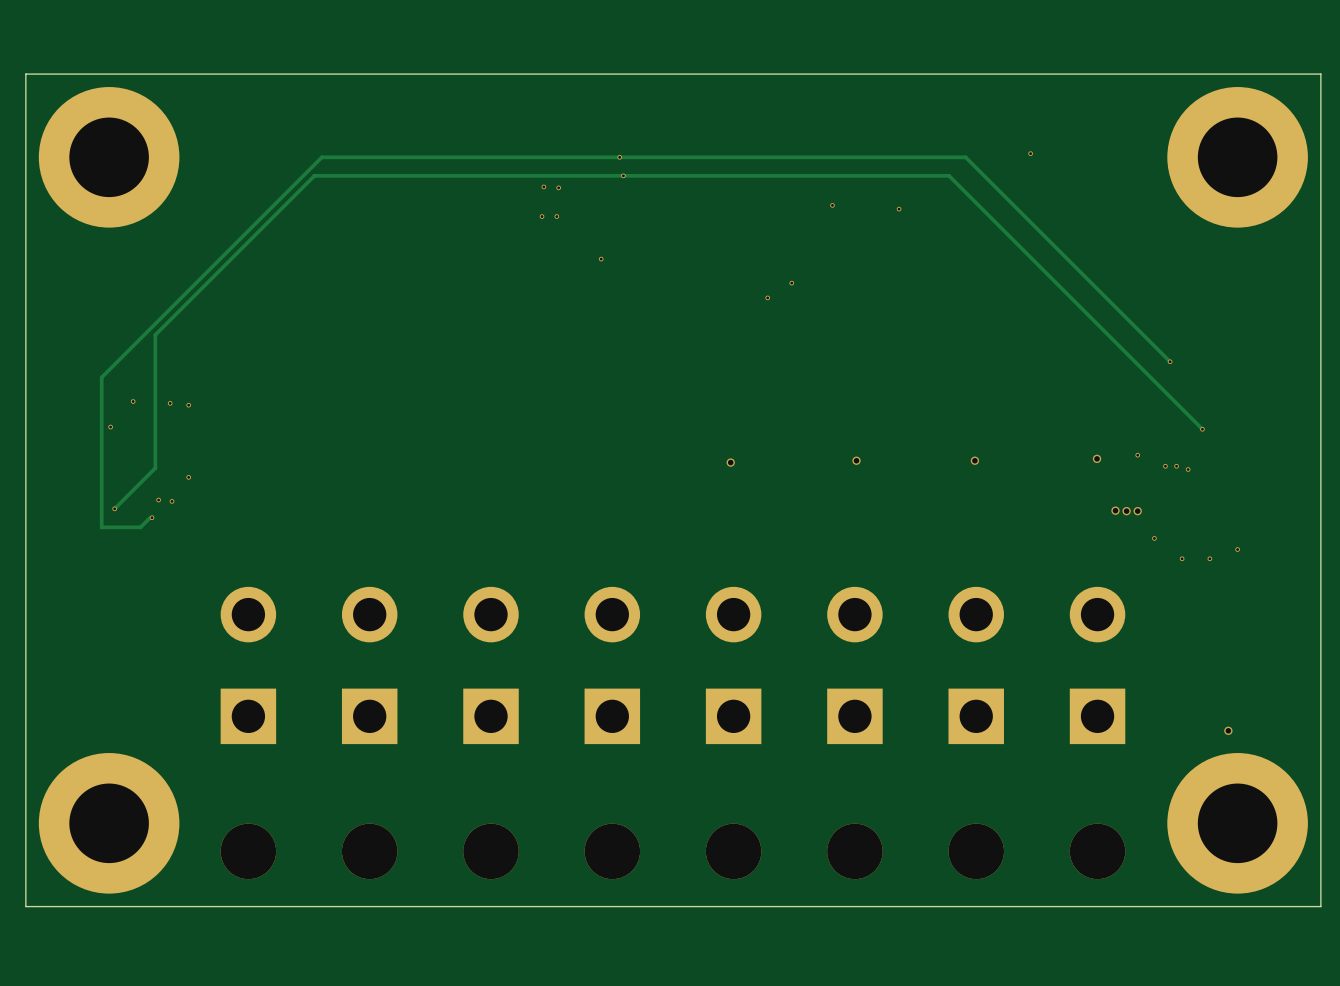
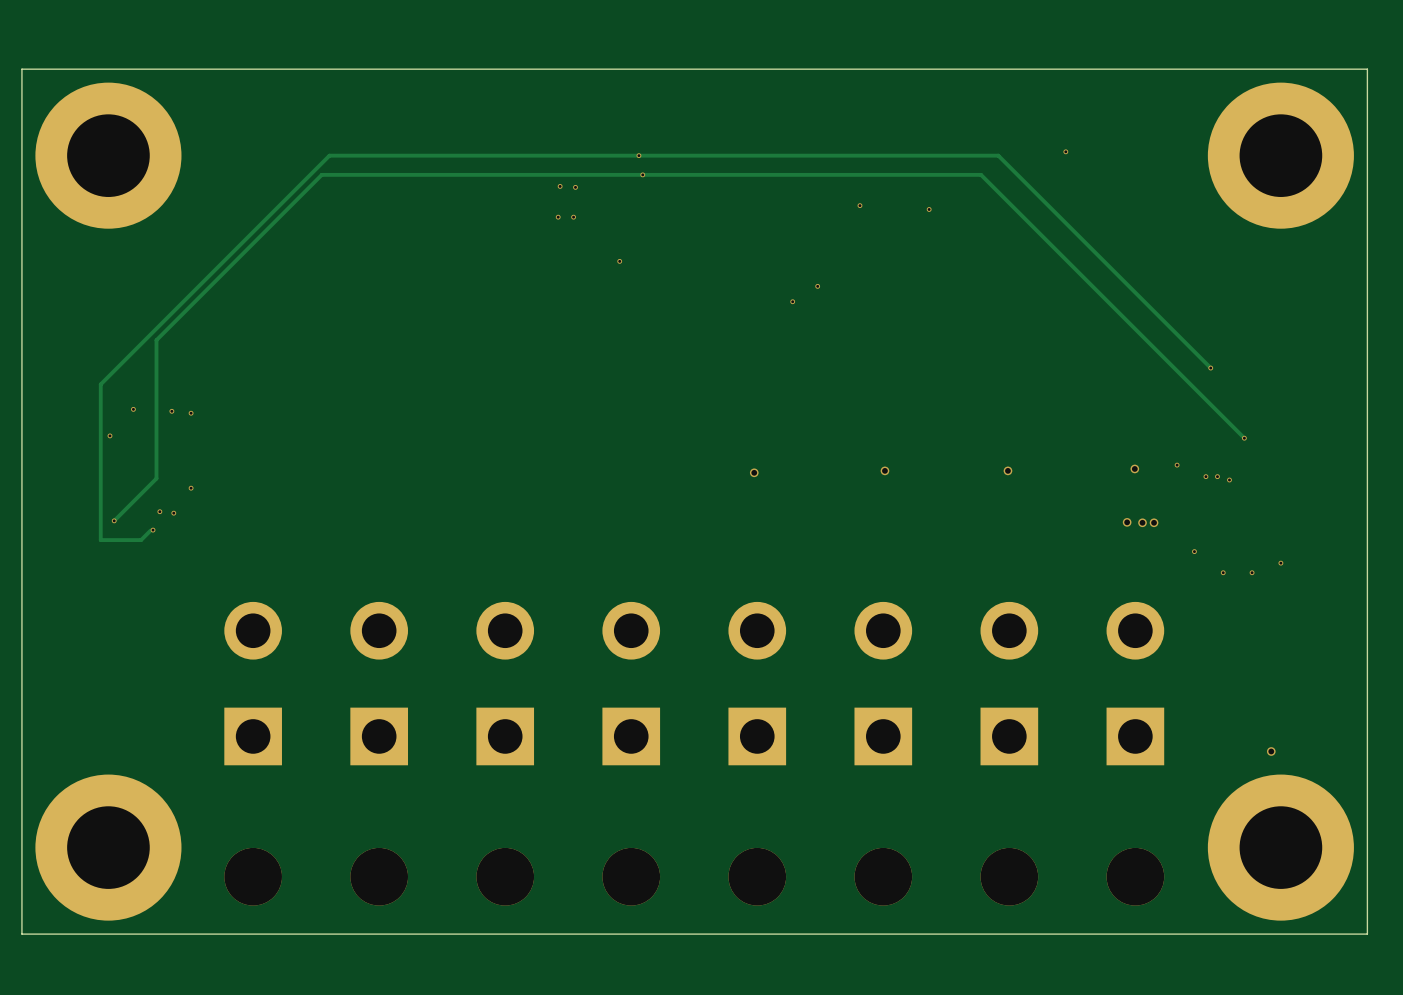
via: none -> (1127, 522)
via: none -> (1142, 522)
via: (1126, 511) -> none
via: (1137, 511) -> none

